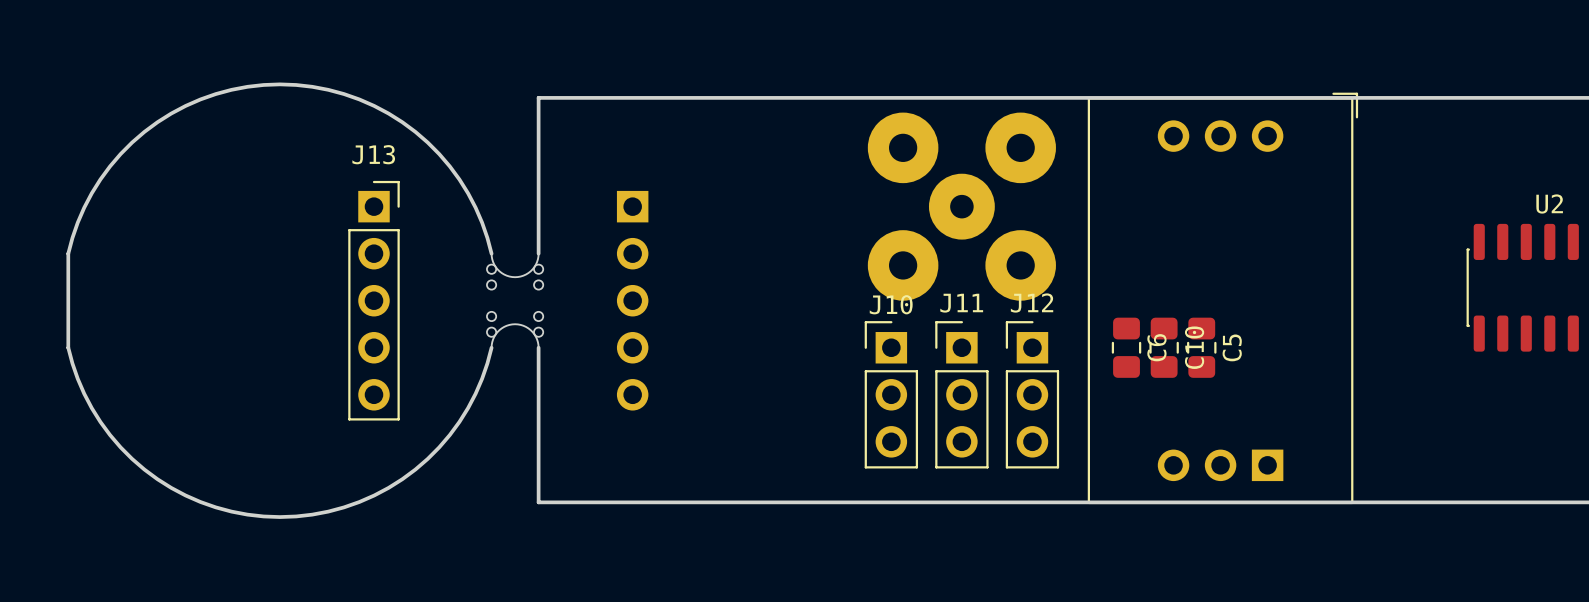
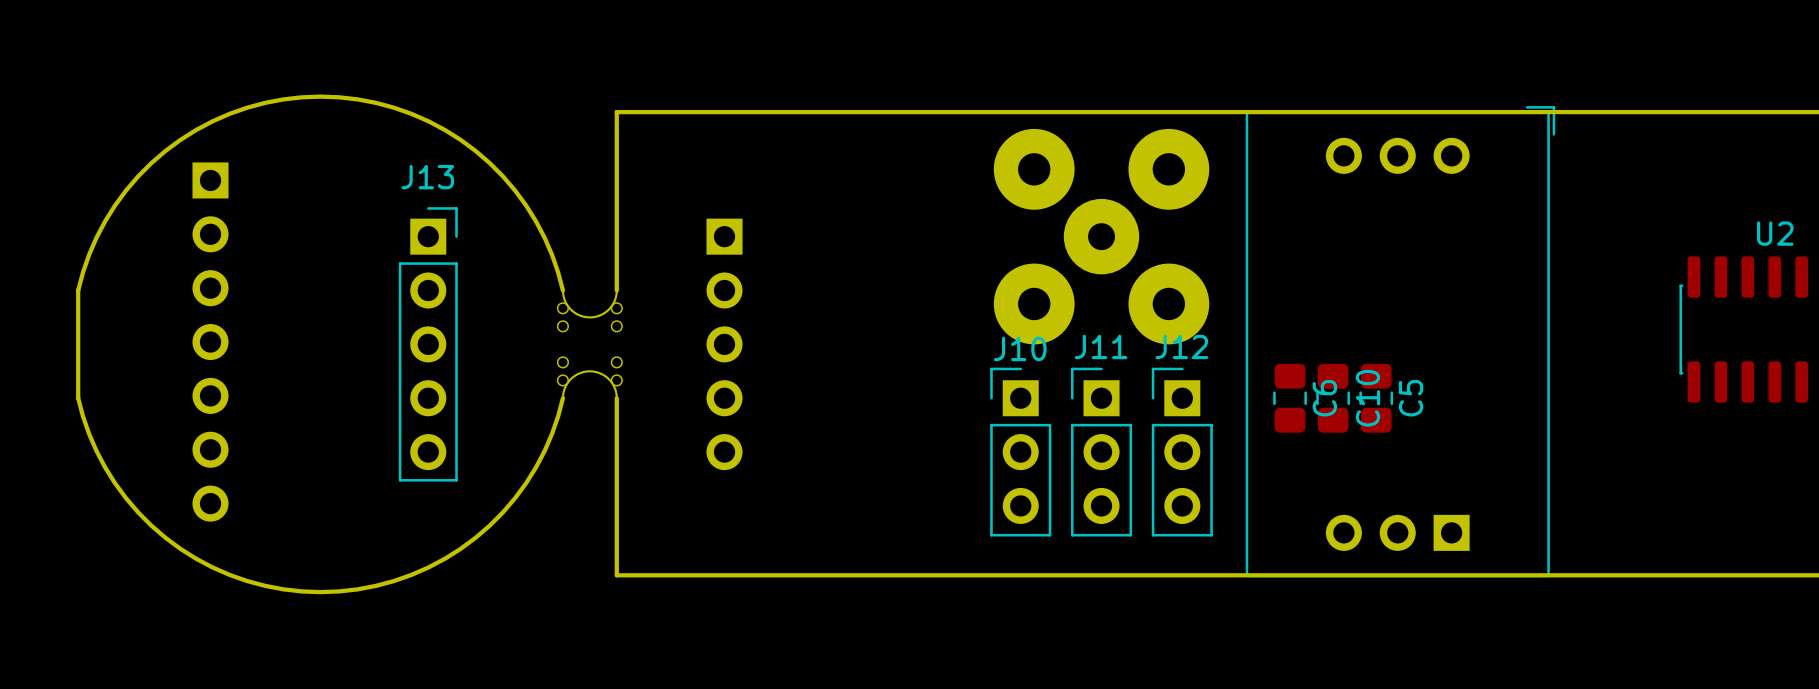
part: none -> (210, 342)

